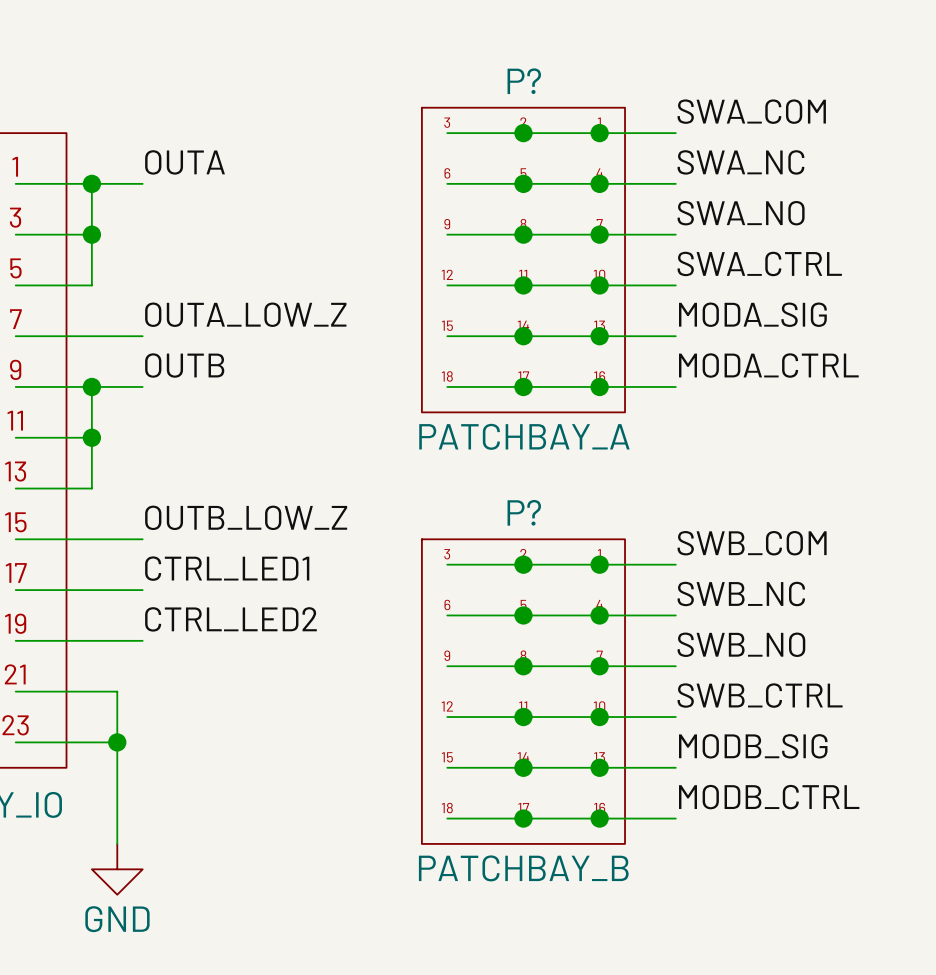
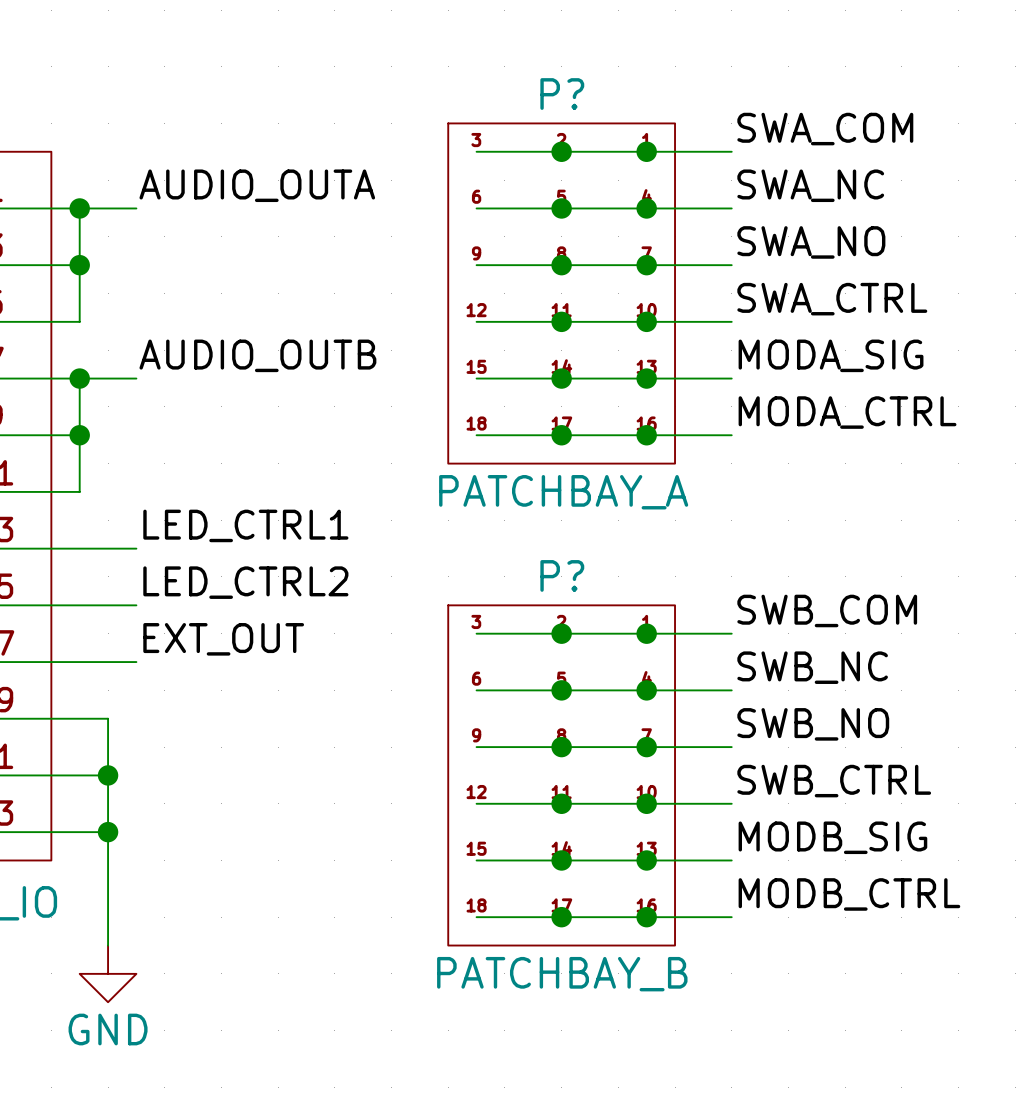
label: OUTA (184, 162) -> AUDIO_OUTA (257, 185)
label: OUTA_LOW_Z (245, 314) -> AUDIO_OUTB (257, 355)
label: OUTB (184, 365) -> none
wire: (91, 386) (142, 386) -> (79, 435) (79, 378)
wire: (91, 437) (91, 488) -> (136, 548) (79, 548)
junction position: (91, 437) -> (79, 378)
label: none -> LED_CTRL1 (245, 525)
label: OUTB_LOW_Z (246, 517) -> LED_CTRL2 (245, 582)
label: CTRL_LED1 (227, 568) -> EXT_OUT (223, 639)
label: CTRL_LED2 (230, 619) -> none
wire: (117, 640) (142, 640) -> (108, 718) (108, 775)
junction: none -> (108, 775)

